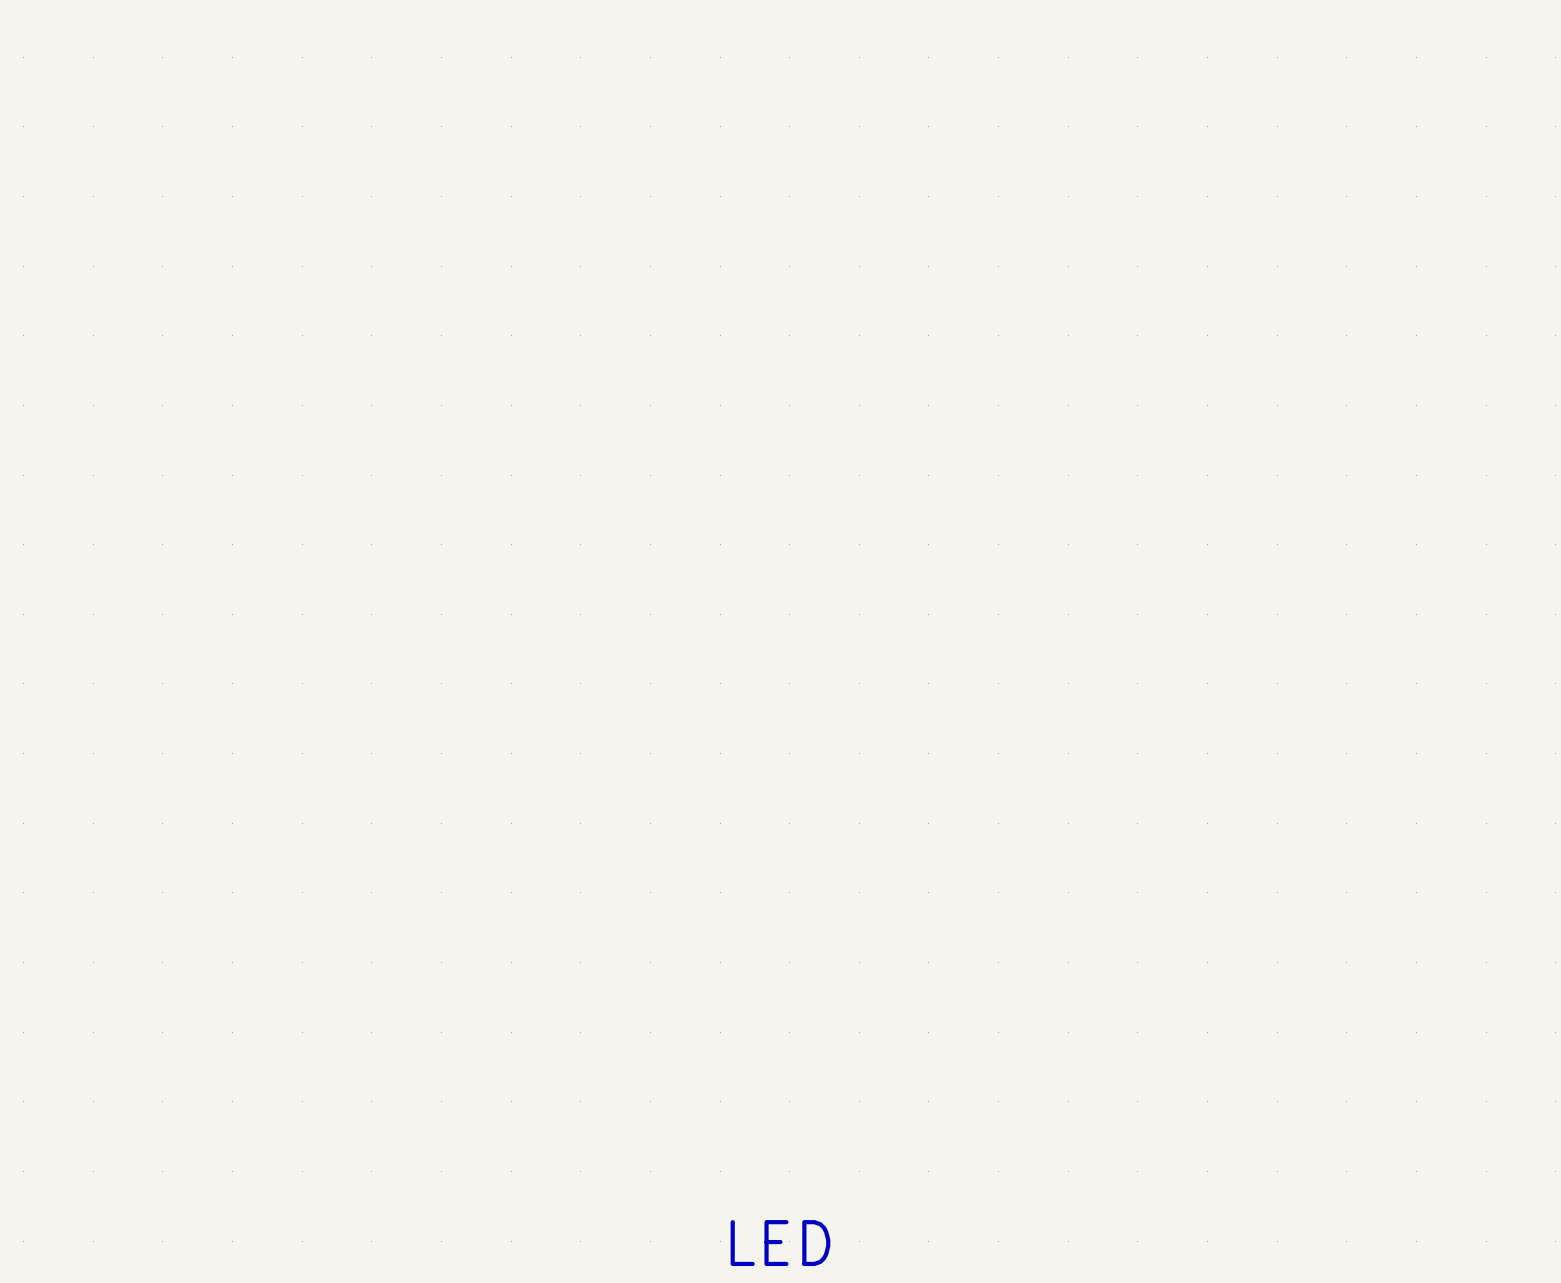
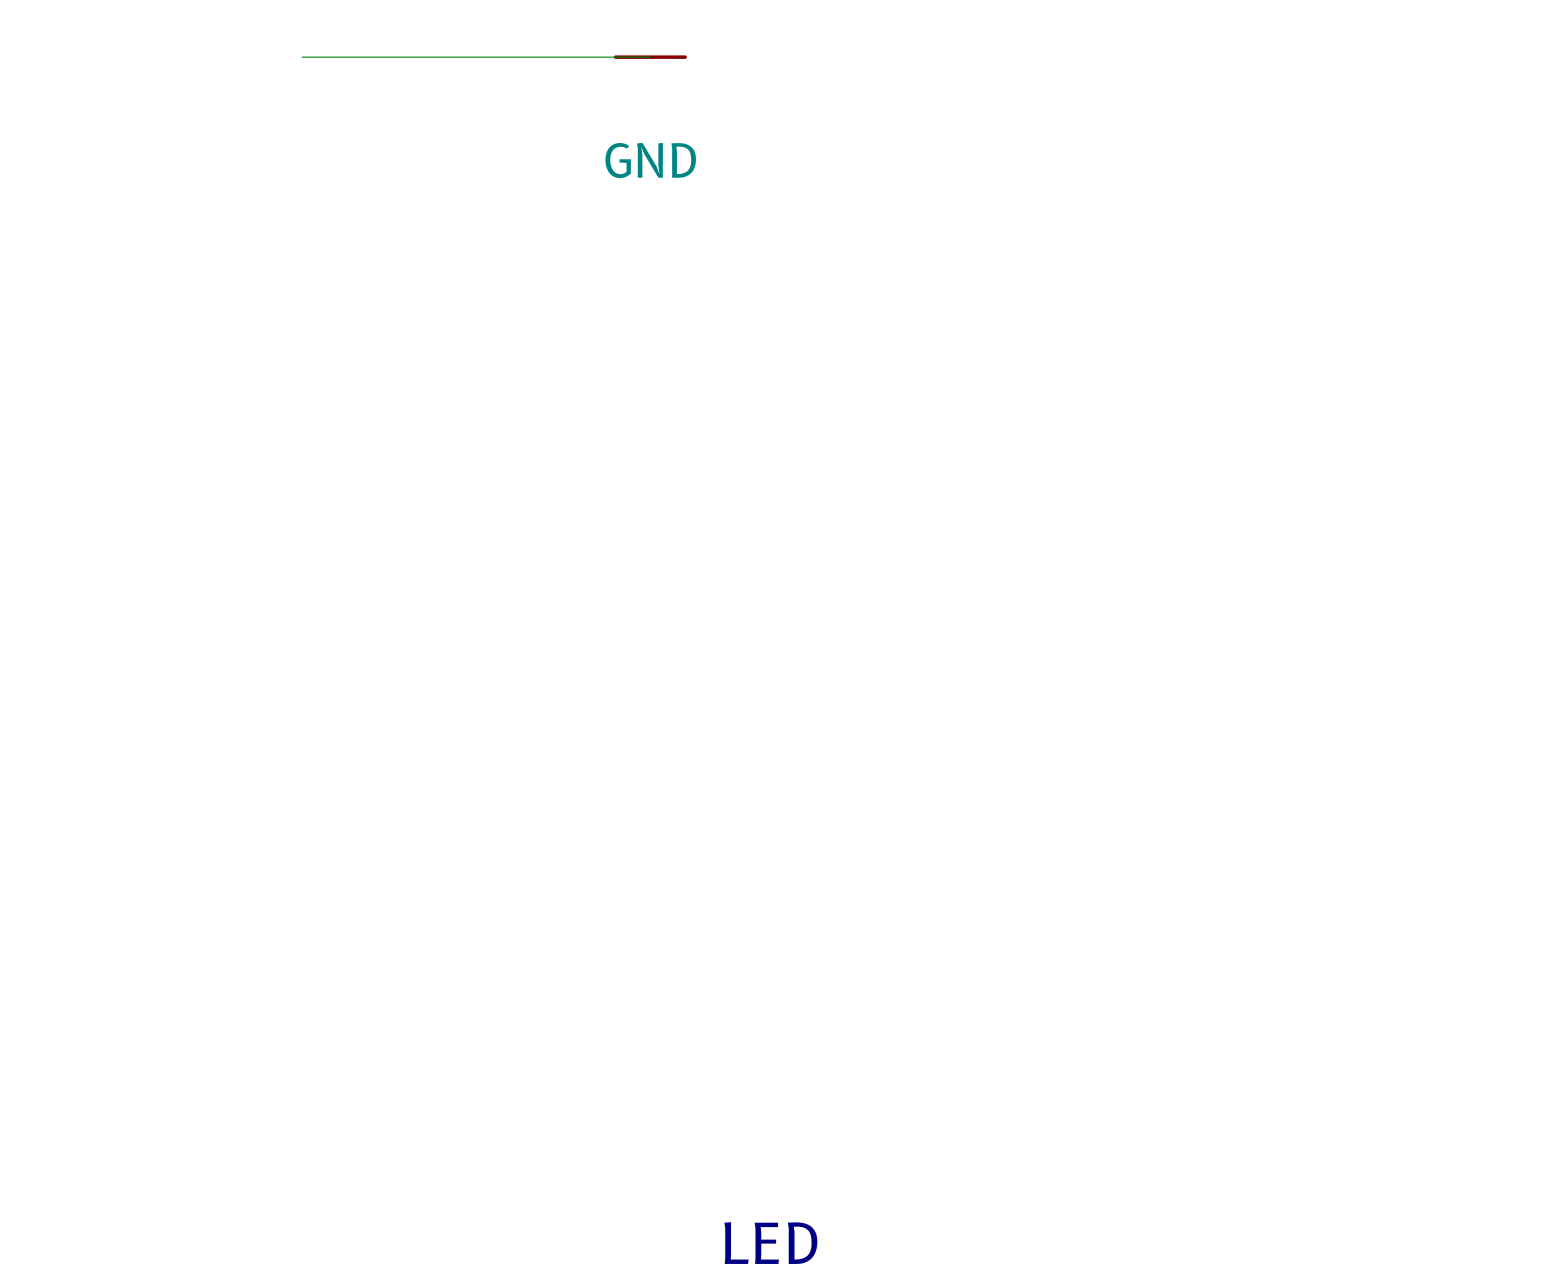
wire: none -> (302, 57) (650, 57)
power symbol: none -> GND (650, 57)

